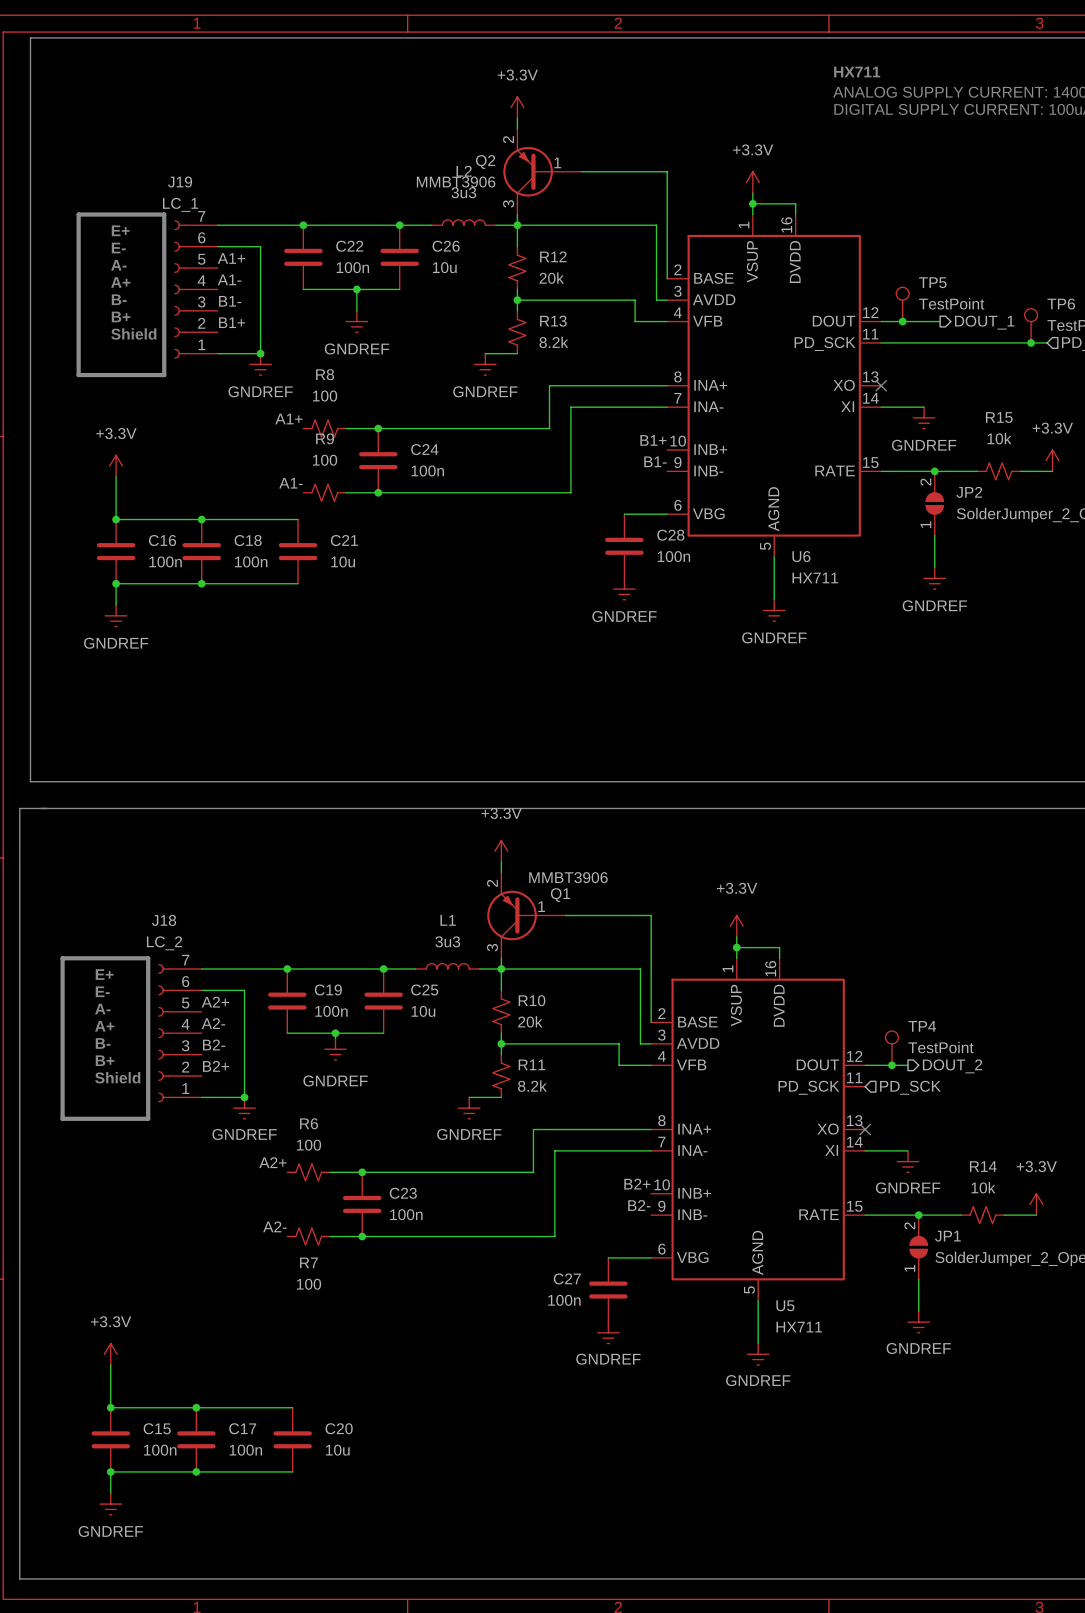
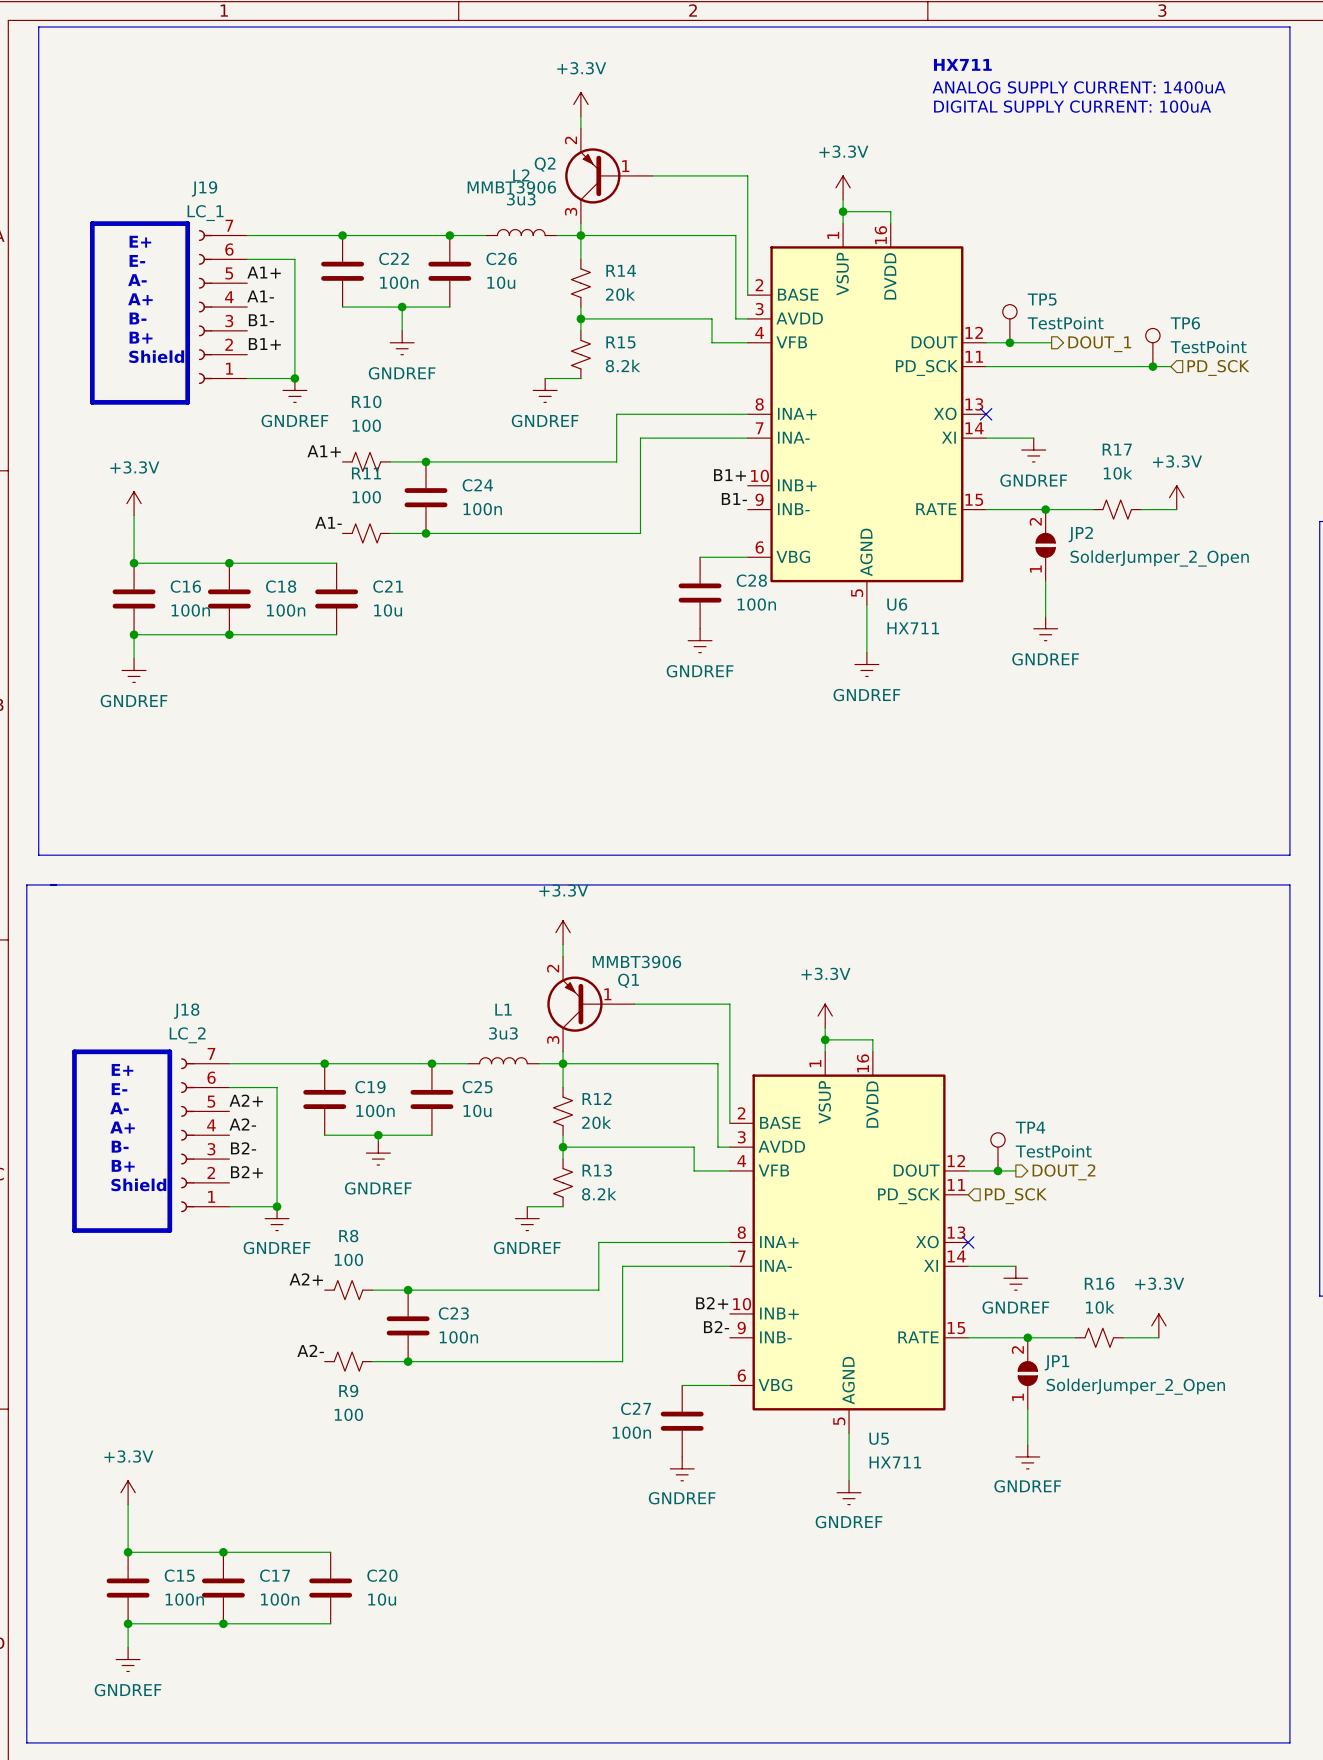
R12 name: R12 (553, 256) -> R14 (621, 270)
R13 name: R13 (553, 321) -> R15 (620, 342)
R8 name: R8 (325, 374) -> R10 (366, 401)
R15 name: R15 (999, 417) -> R17 (1117, 449)
R9 name: R9 (325, 438) -> R11 (366, 473)
R10 name: R10 (532, 1000) -> R12 (596, 1098)
R11 name: R11 (531, 1064) -> R13 (597, 1170)
R6 name: R6 (309, 1123) -> R8 (348, 1236)
R14 name: R14 (983, 1166) -> R16 (1099, 1283)
R7 name: R7 (308, 1262) -> R9 (348, 1390)

